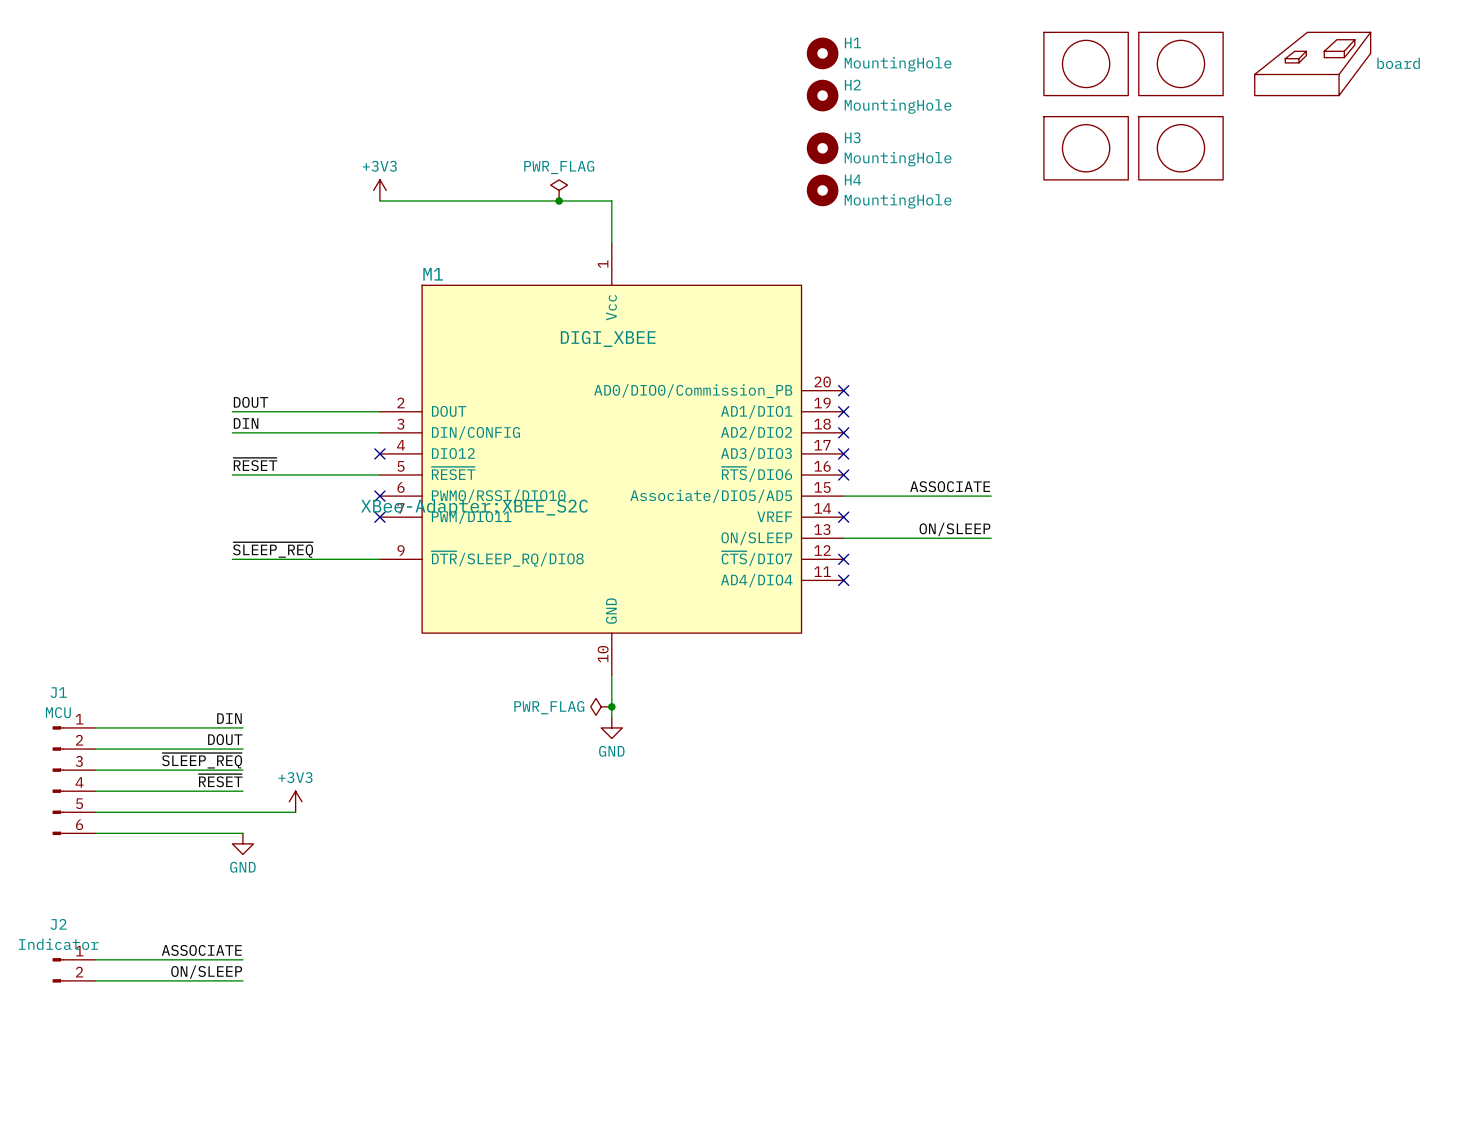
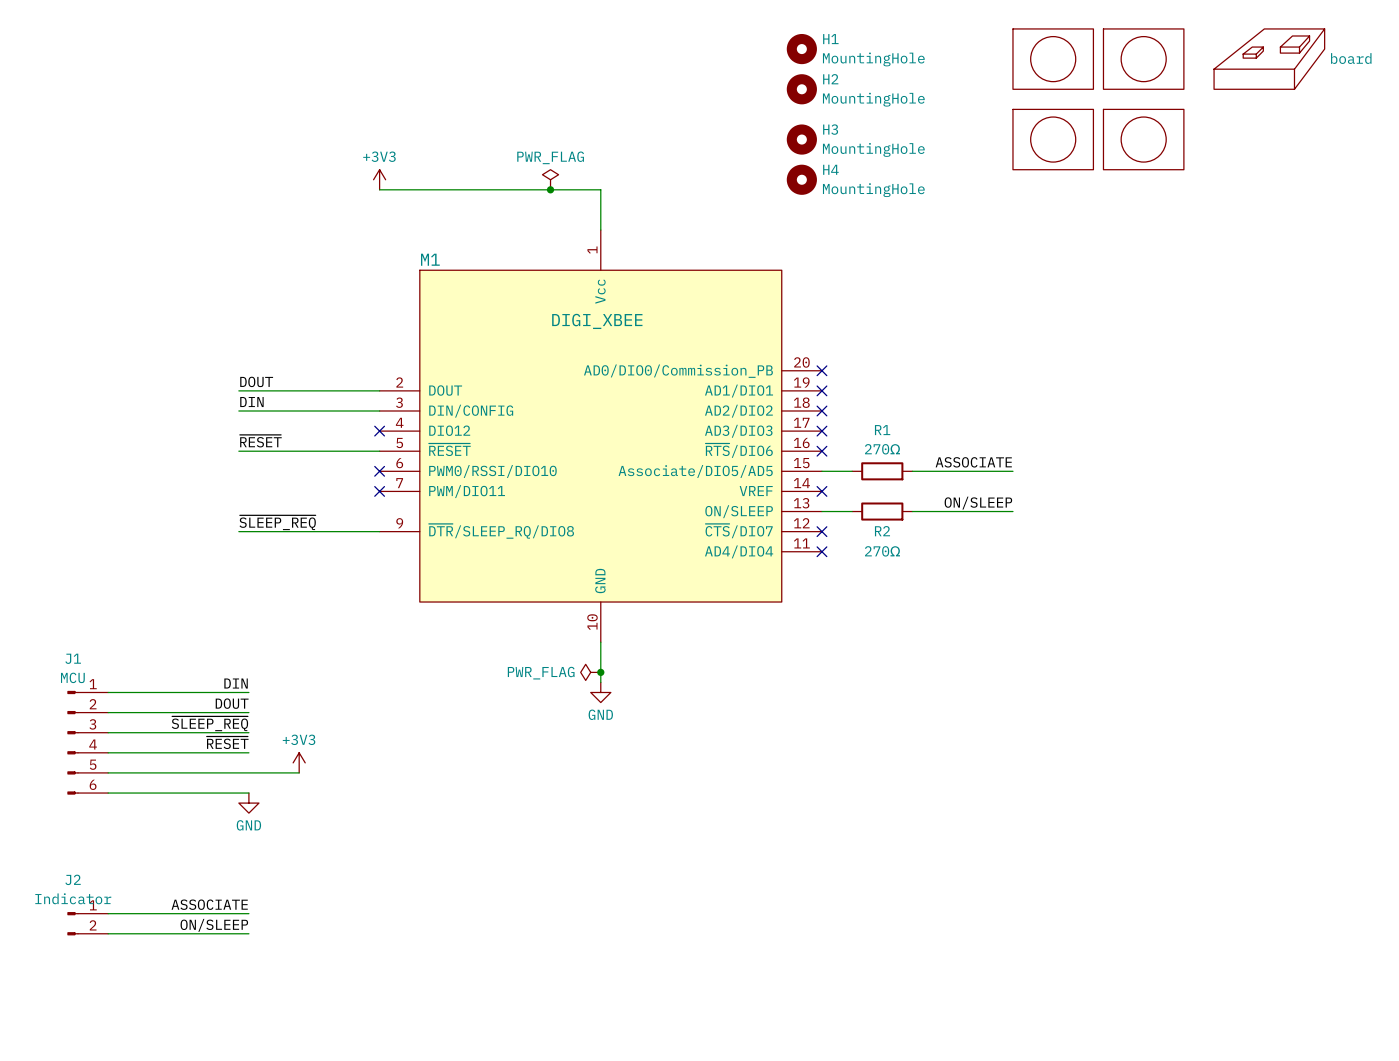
label position: ASSOCIATE (950, 486) -> ASSOCIATE (973, 462)
wire: (875, 496) (938, 496) -> none
R1: none -> 270Ω (882, 471)
wire: none -> (962, 471) (1012, 471)
M1 text: XBee-Adapter:XBEE_S2C (474, 507) -> none
label position: ON/SLEEP (954, 529) -> ON/SLEEP (978, 503)
wire: (875, 538) (938, 538) -> none
R2: none -> 270Ω (882, 511)
wire: none -> (962, 511) (1012, 511)

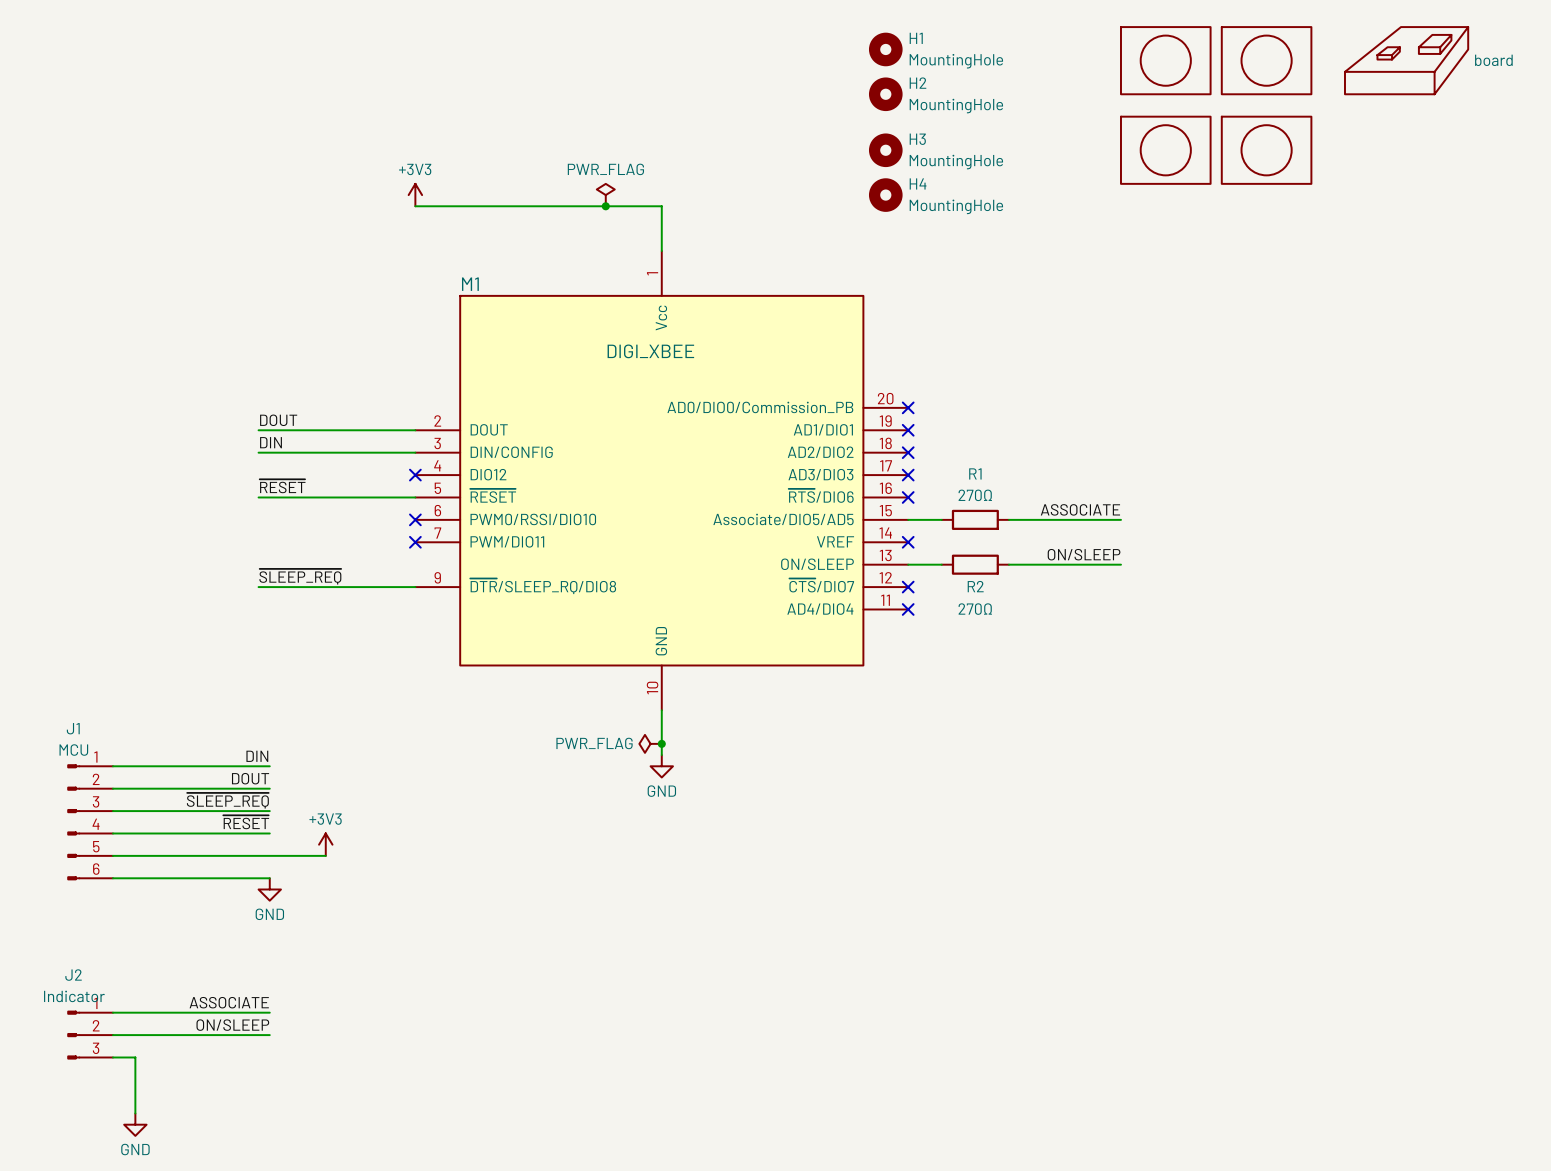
J2 symbol: [67, 912, 109, 936] -> [67, 1010, 113, 1060]
wire: none -> (112, 1057) (135, 1057) (135, 1113)
power symbol: none -> GND (135, 1124)

